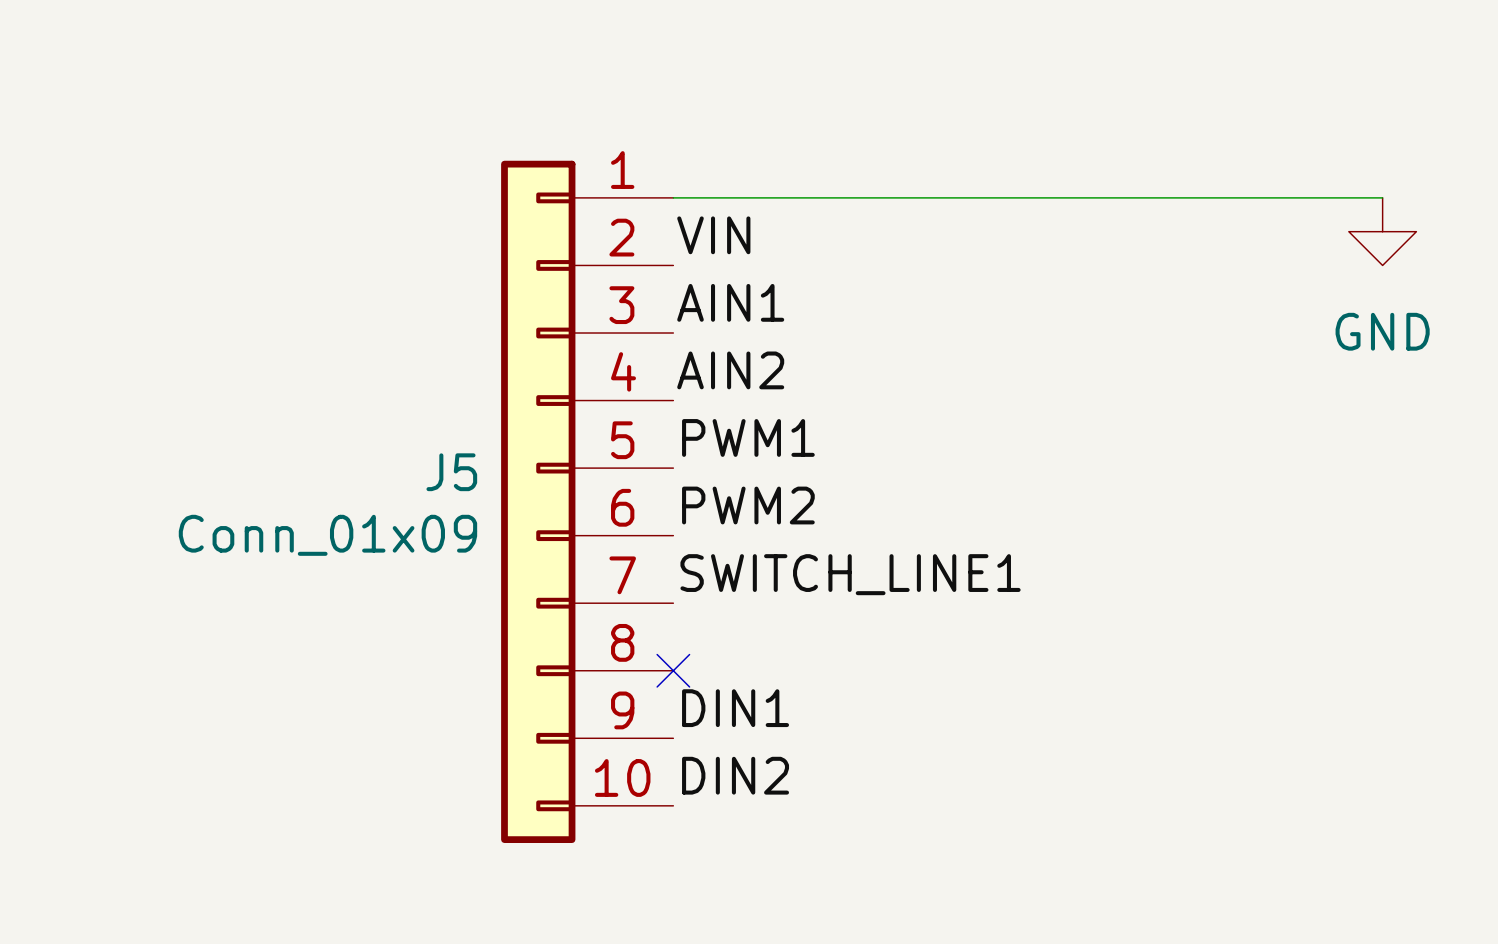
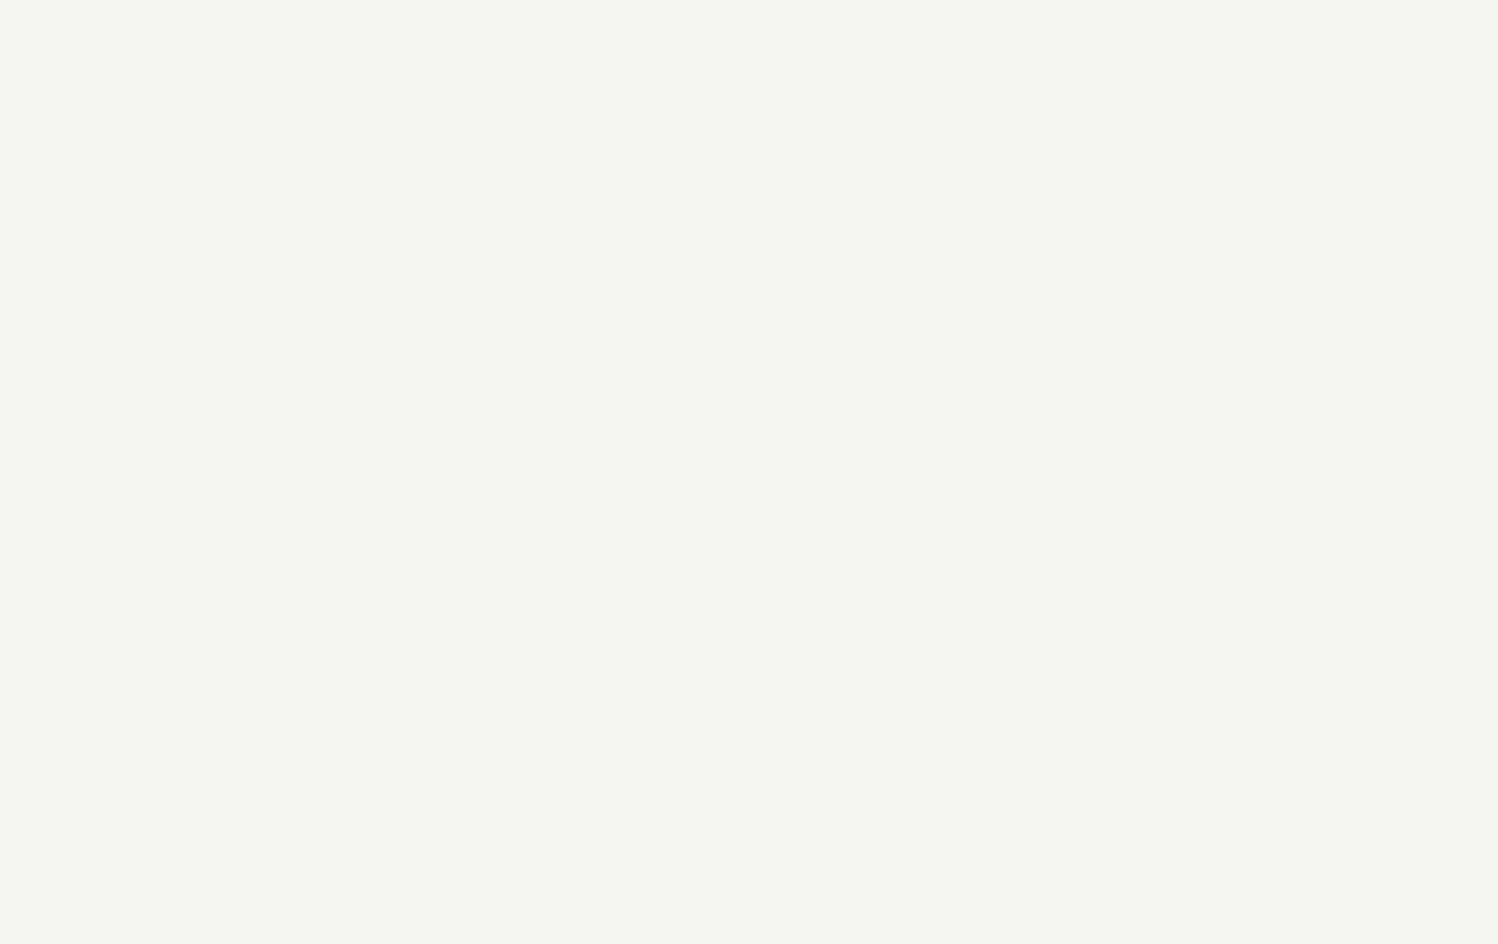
wire: (673, 197) (1382, 197) -> none
power symbol: GND (1382, 231) -> none
label: VIN (713, 235) -> none
label: AIN1 (730, 302) -> none
label: AIN2 (730, 370) -> none
label: PWM1 (748, 437) -> none
J5: Conn_01x09 (587, 501) -> none
label: PWM2 (748, 505) -> none
label: SWITCH_LINE1 (850, 574) -> none
no-connect mark: (673, 670) -> none
label: DIN1 (735, 708) -> none
label: DIN2 (735, 775) -> none

